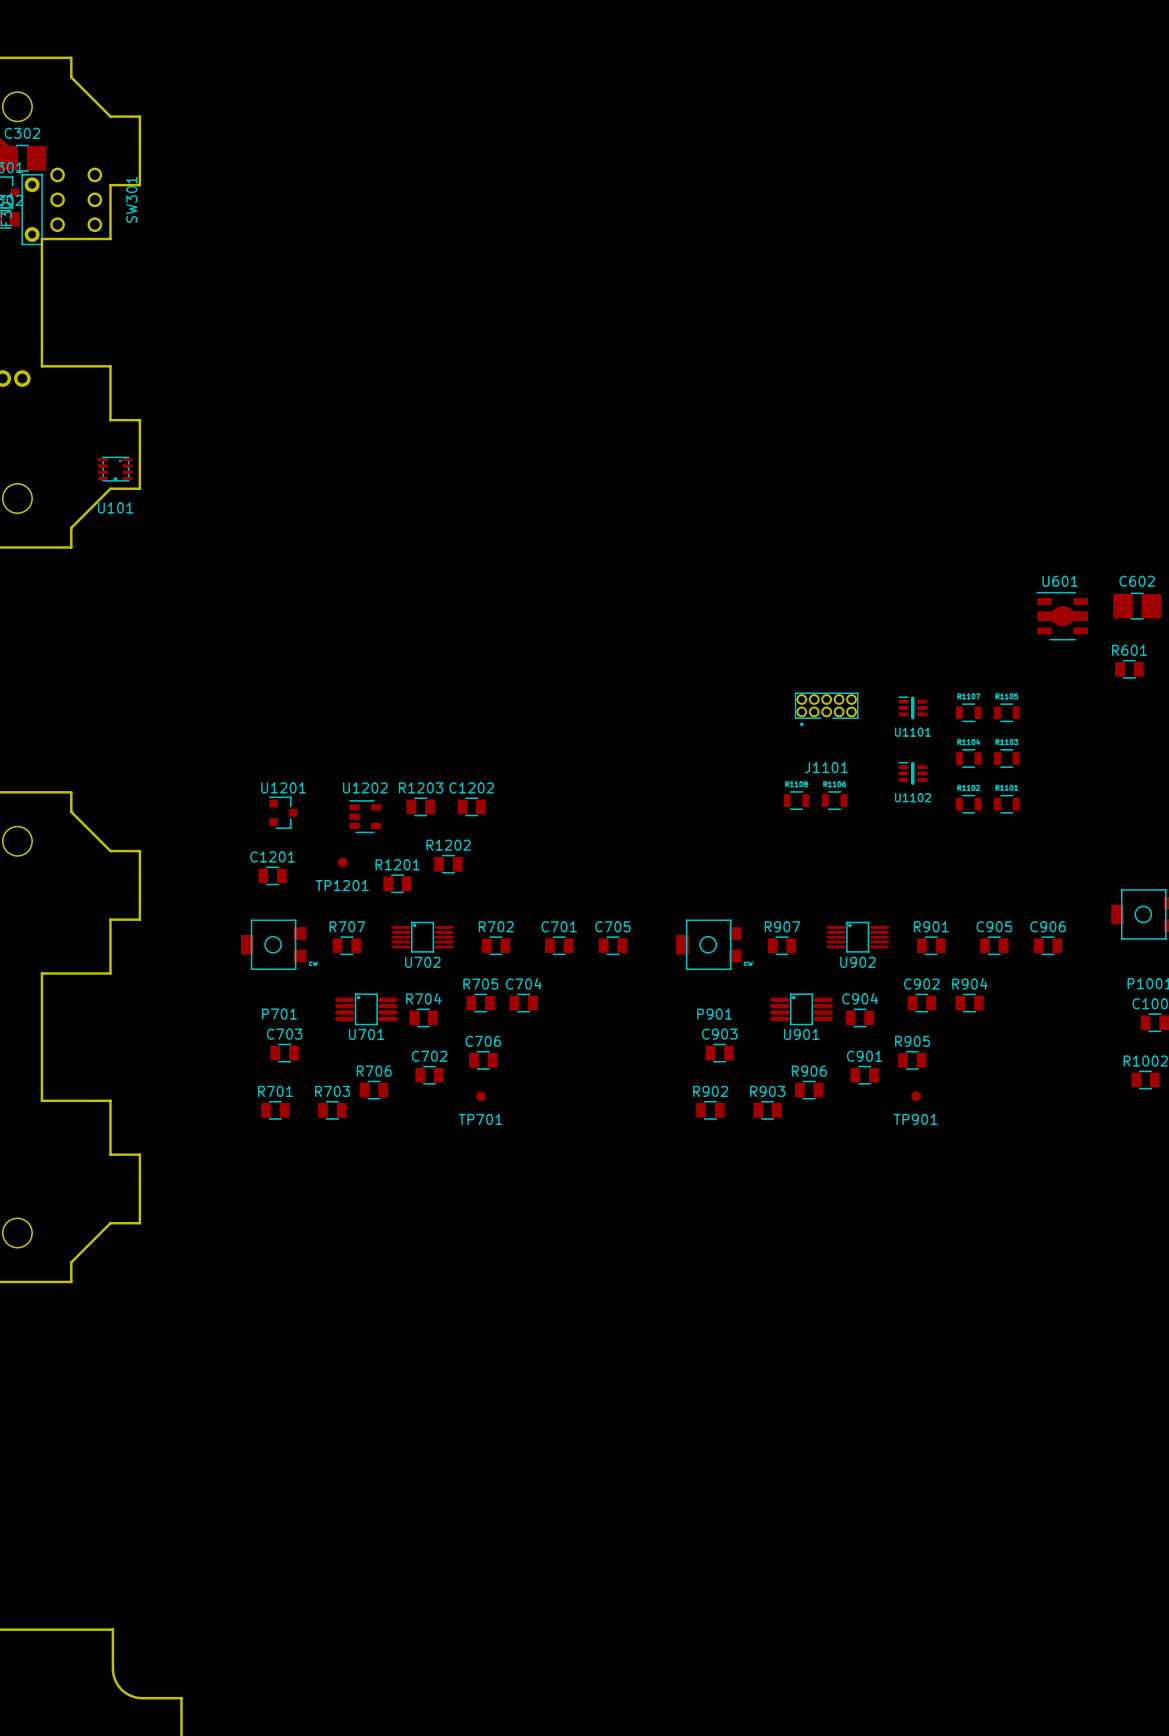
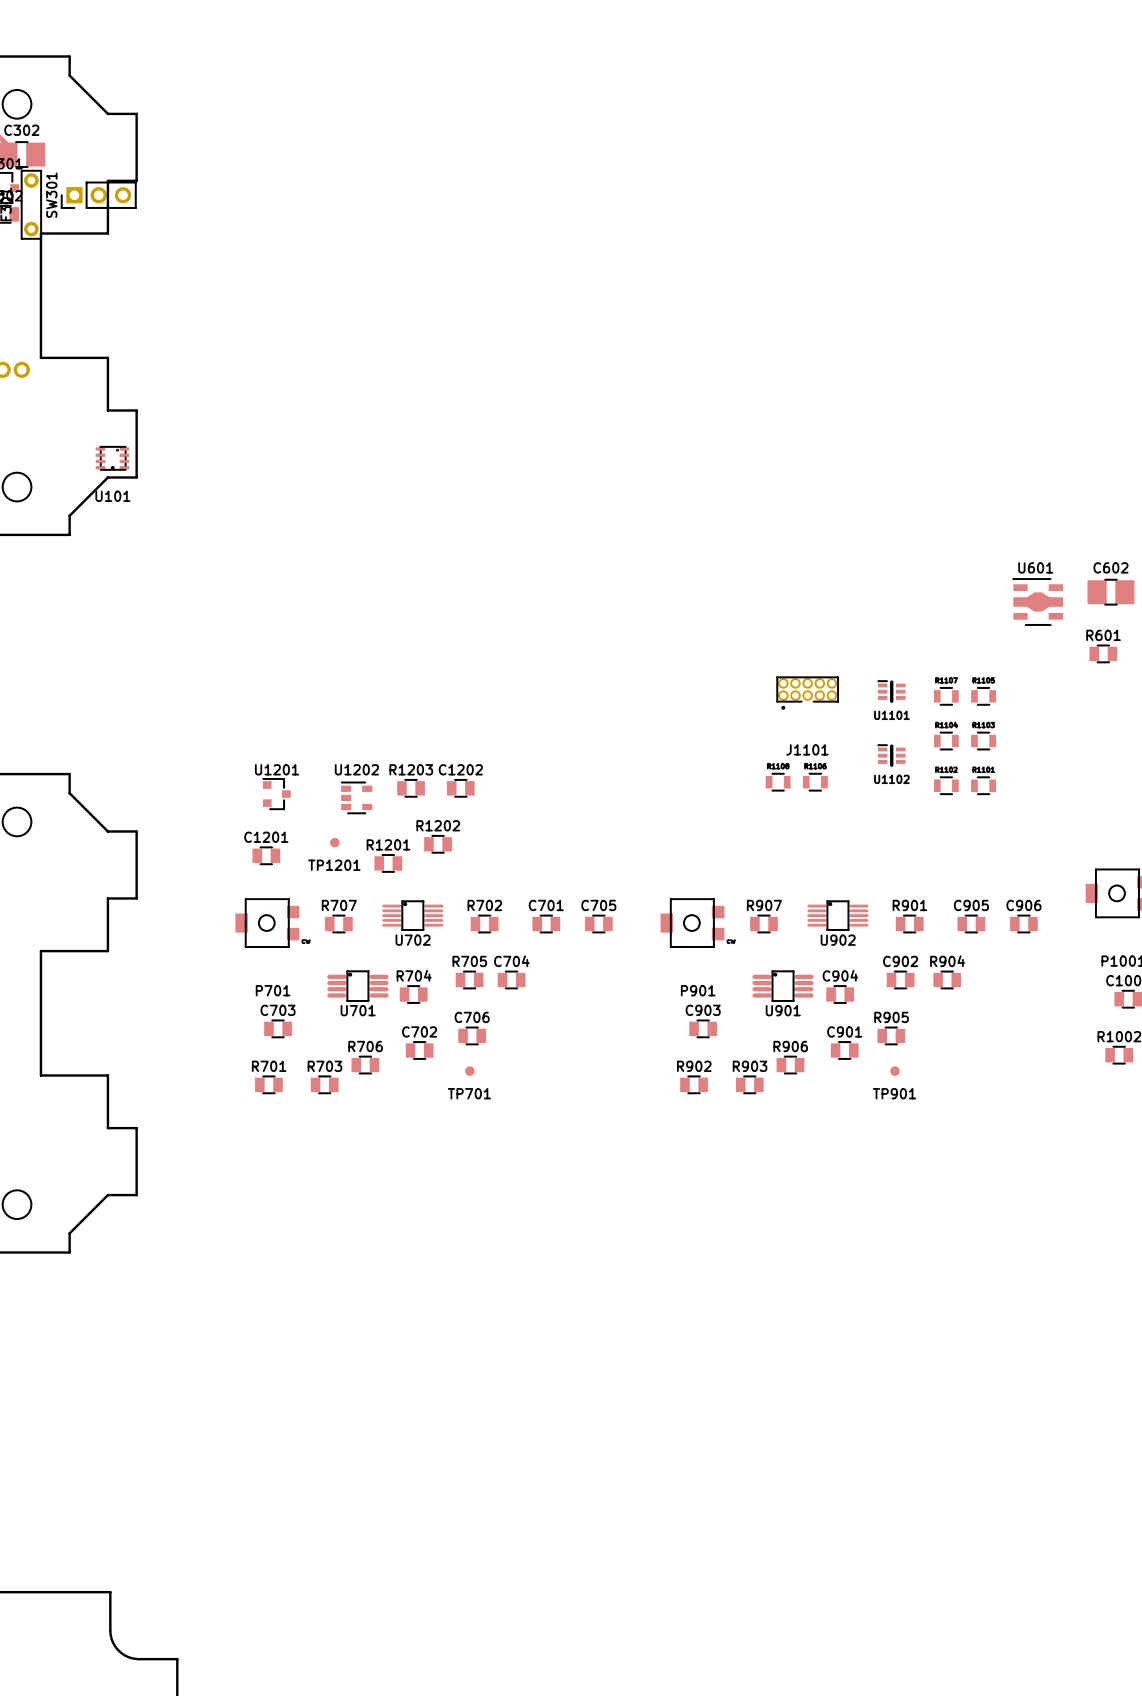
SW301 footprint: [50, 167, 103, 233] -> [61, 181, 137, 209]
SW301 name position: SW301 (131, 199) -> SW301 (51, 195)

